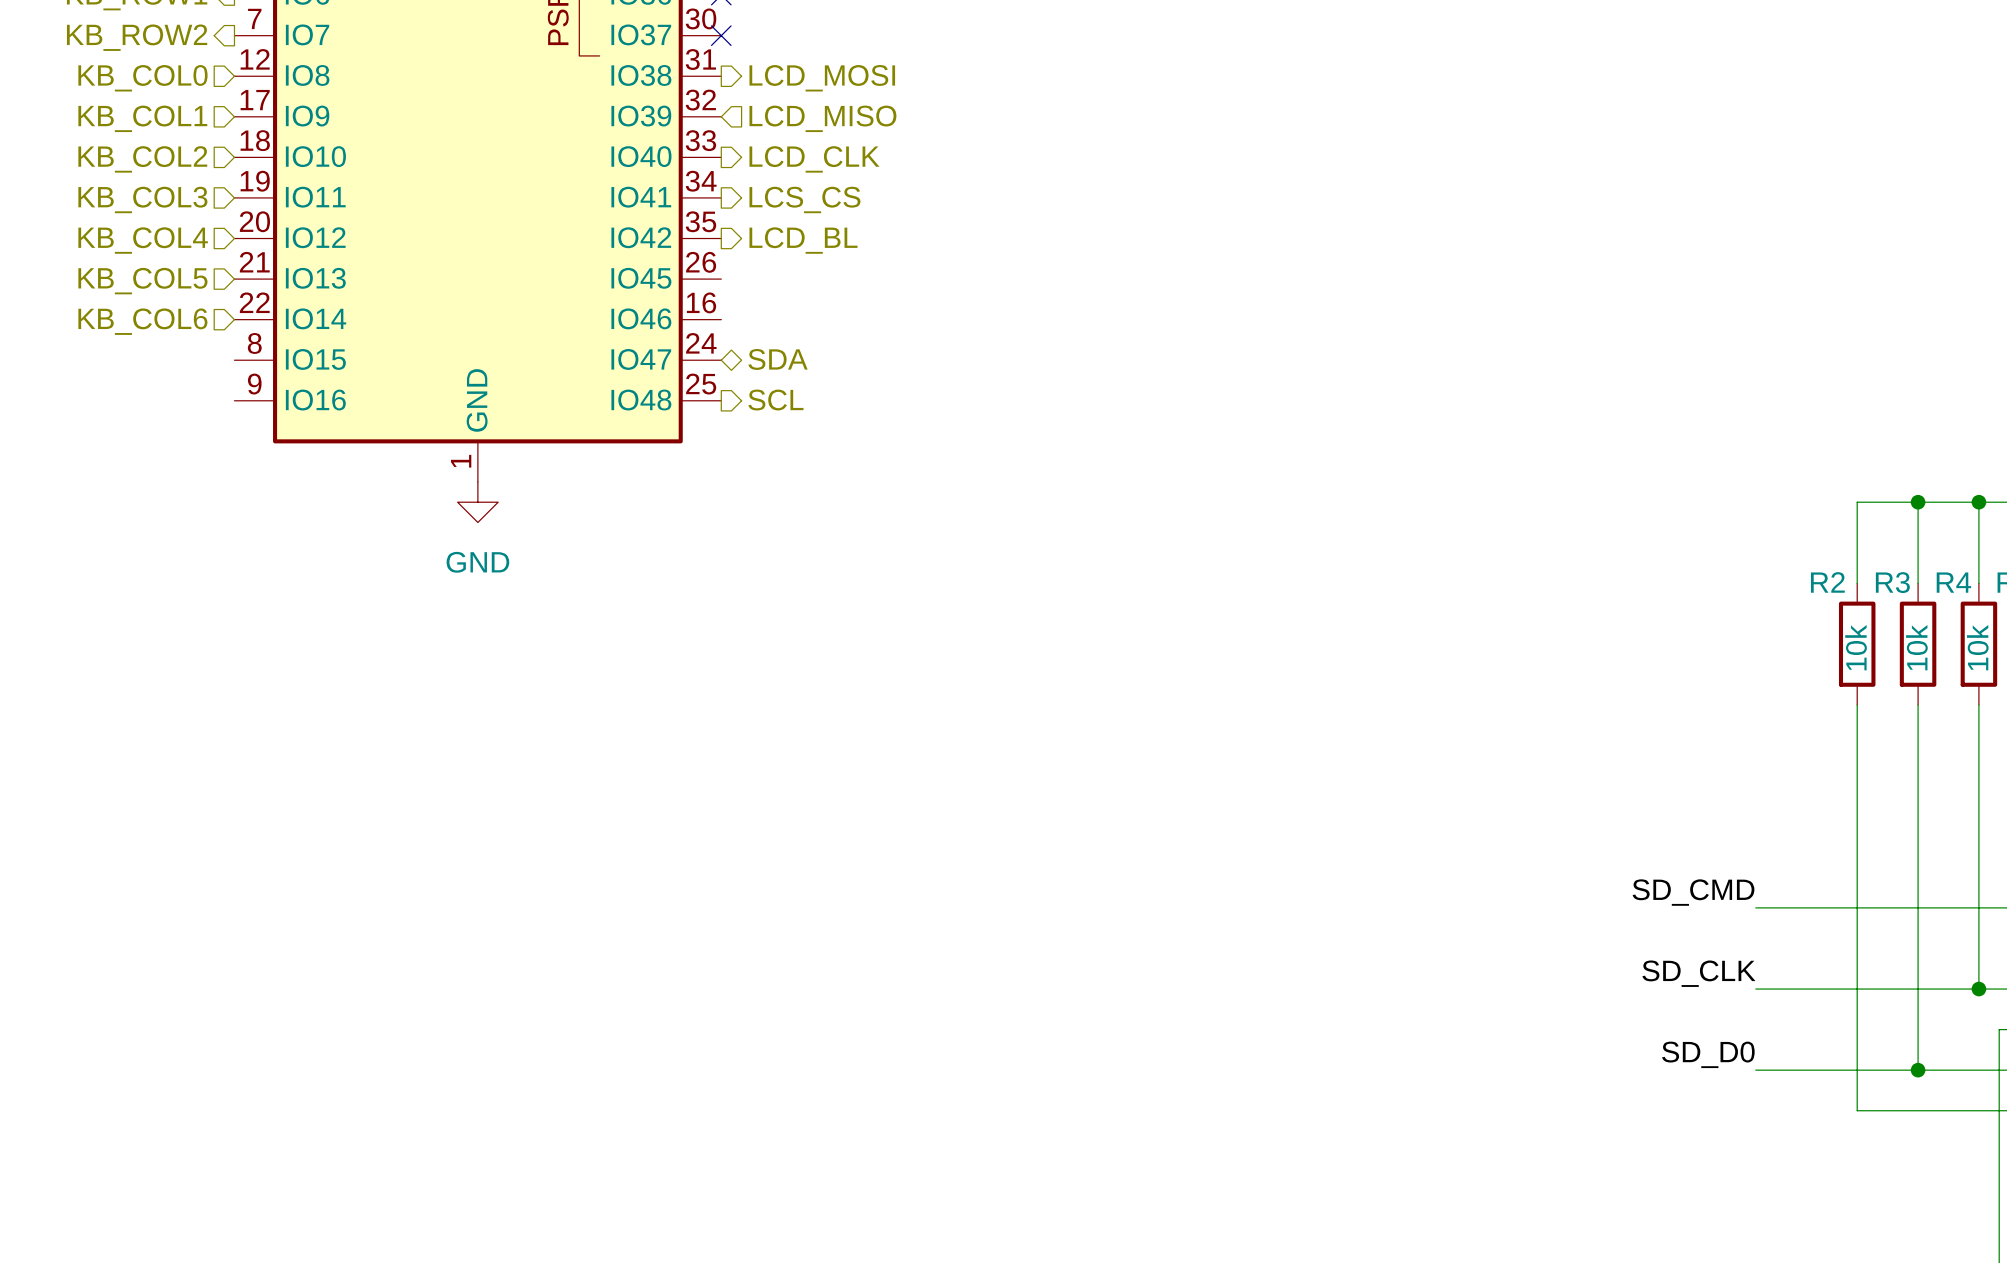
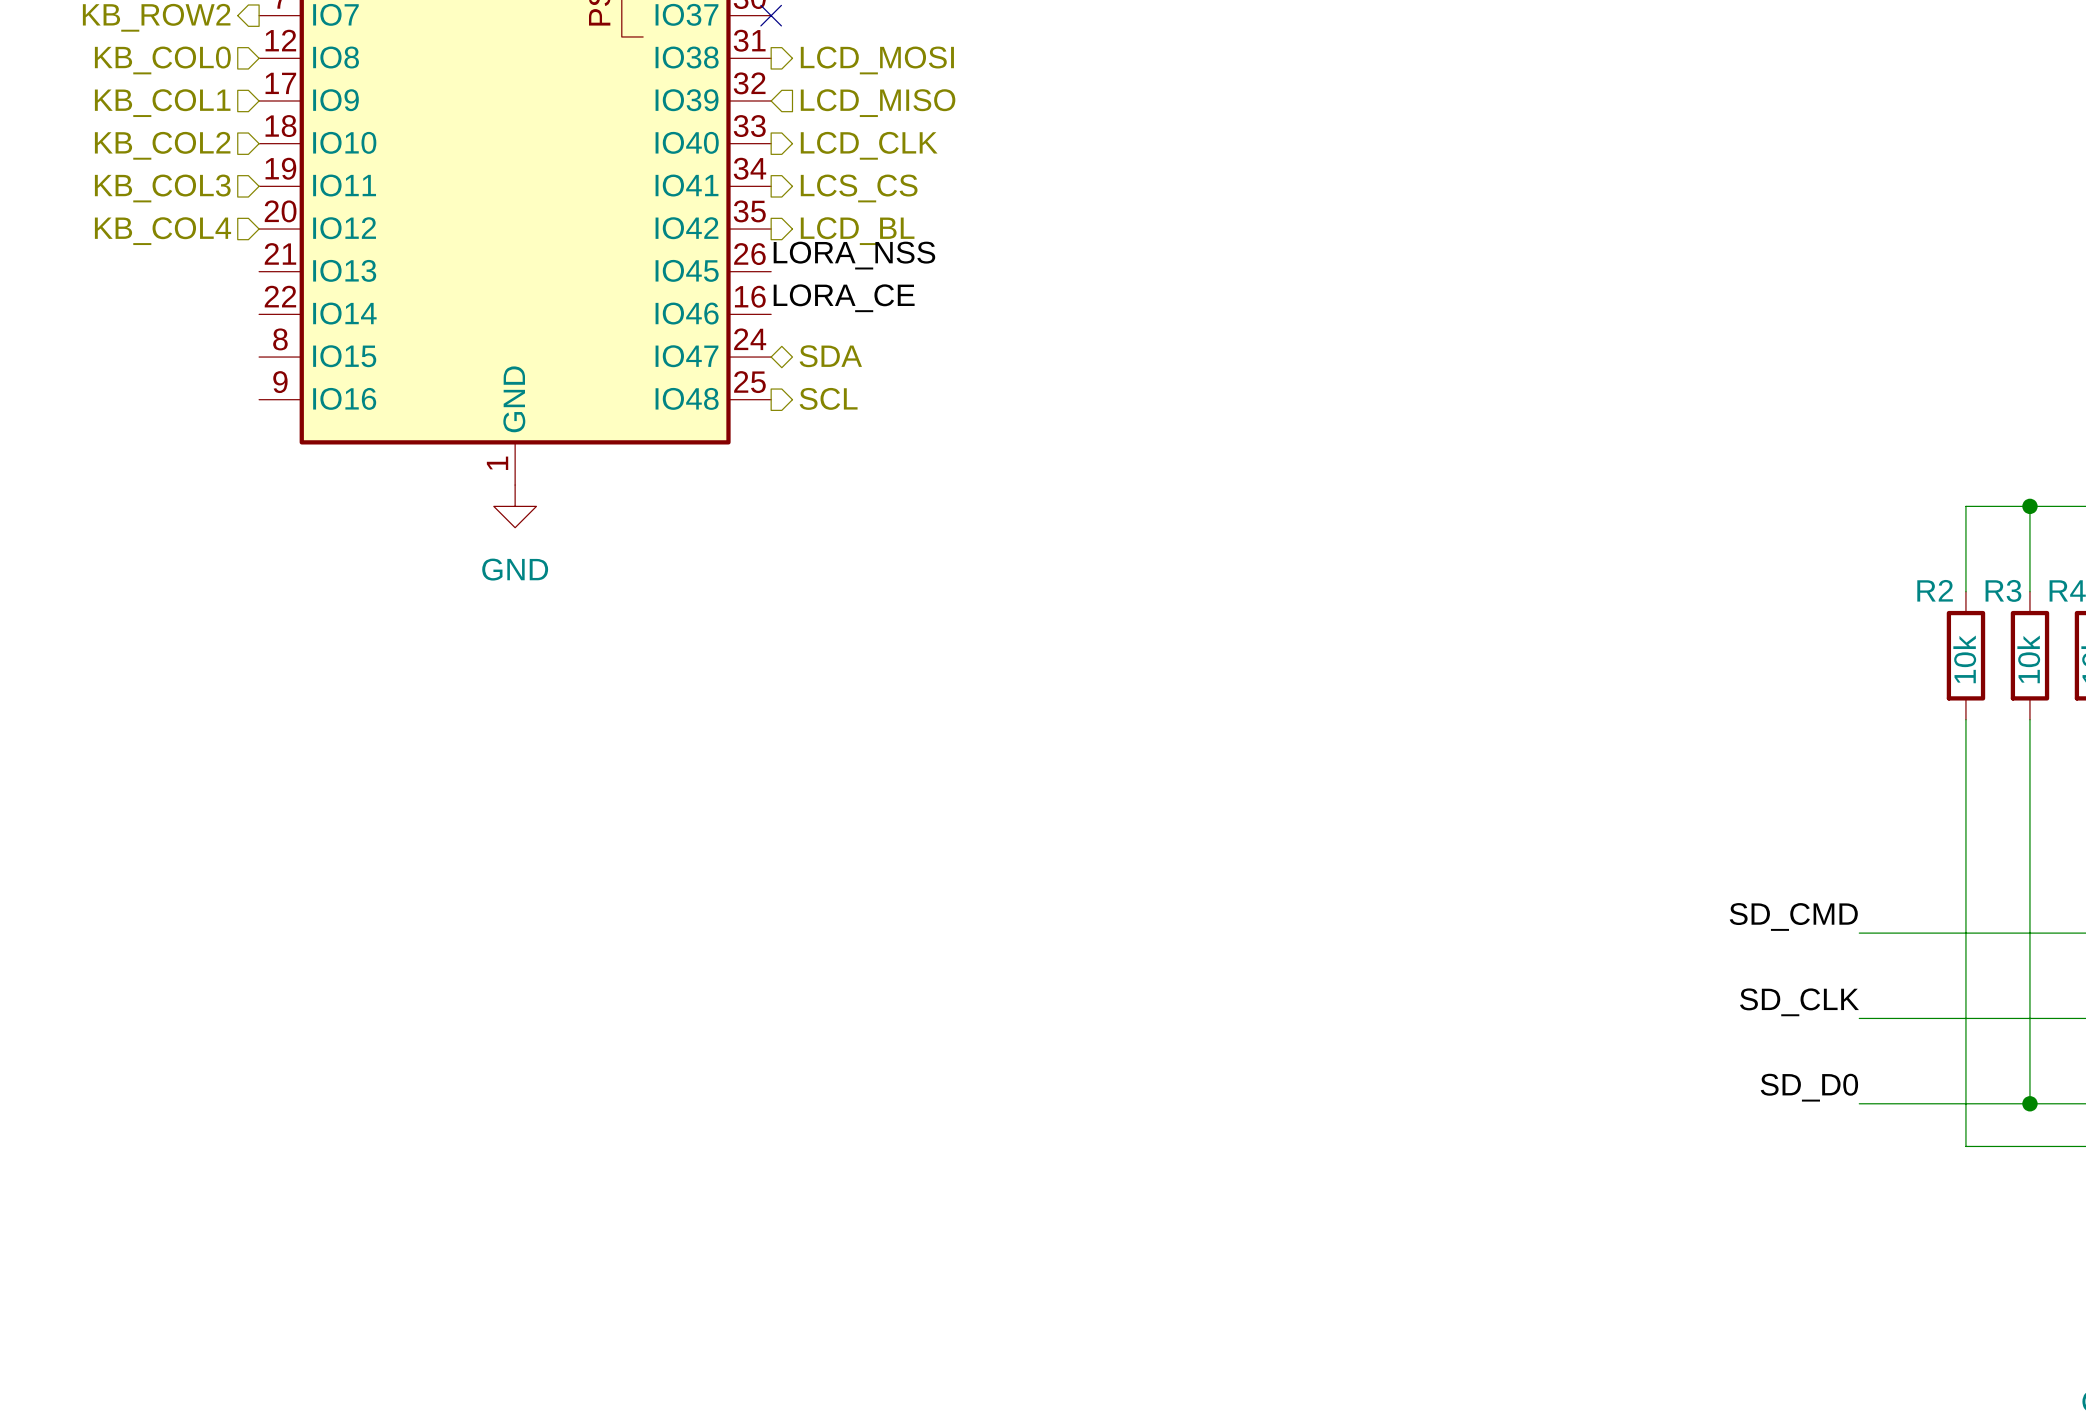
label: none -> LORA_NSS (854, 255)
hierarchical label: KB_COL5 (142, 281) -> none
label: none -> LORA_CE (844, 298)
hierarchical label: KB_COL6 (142, 321) -> none

